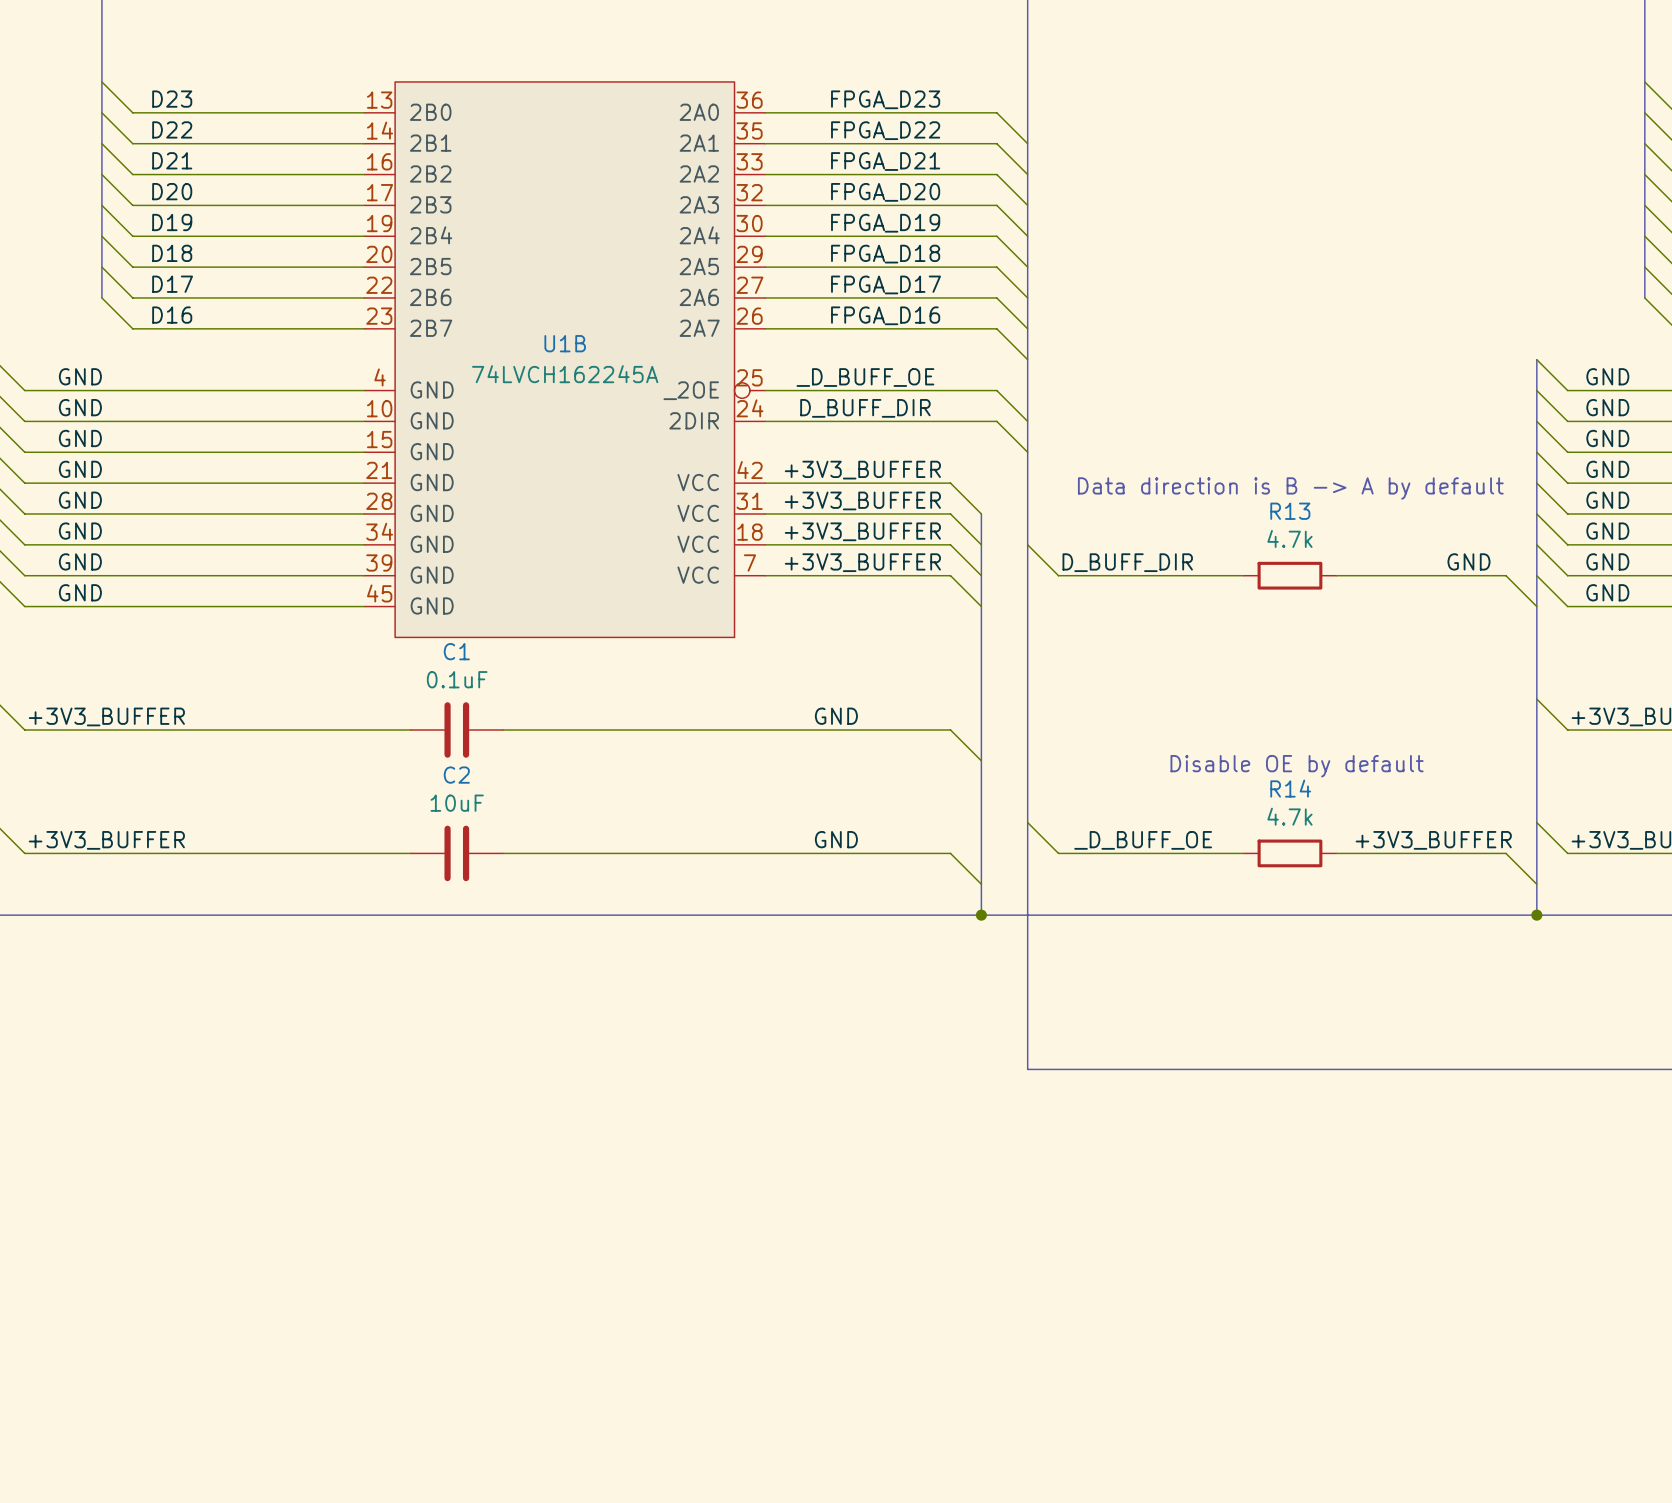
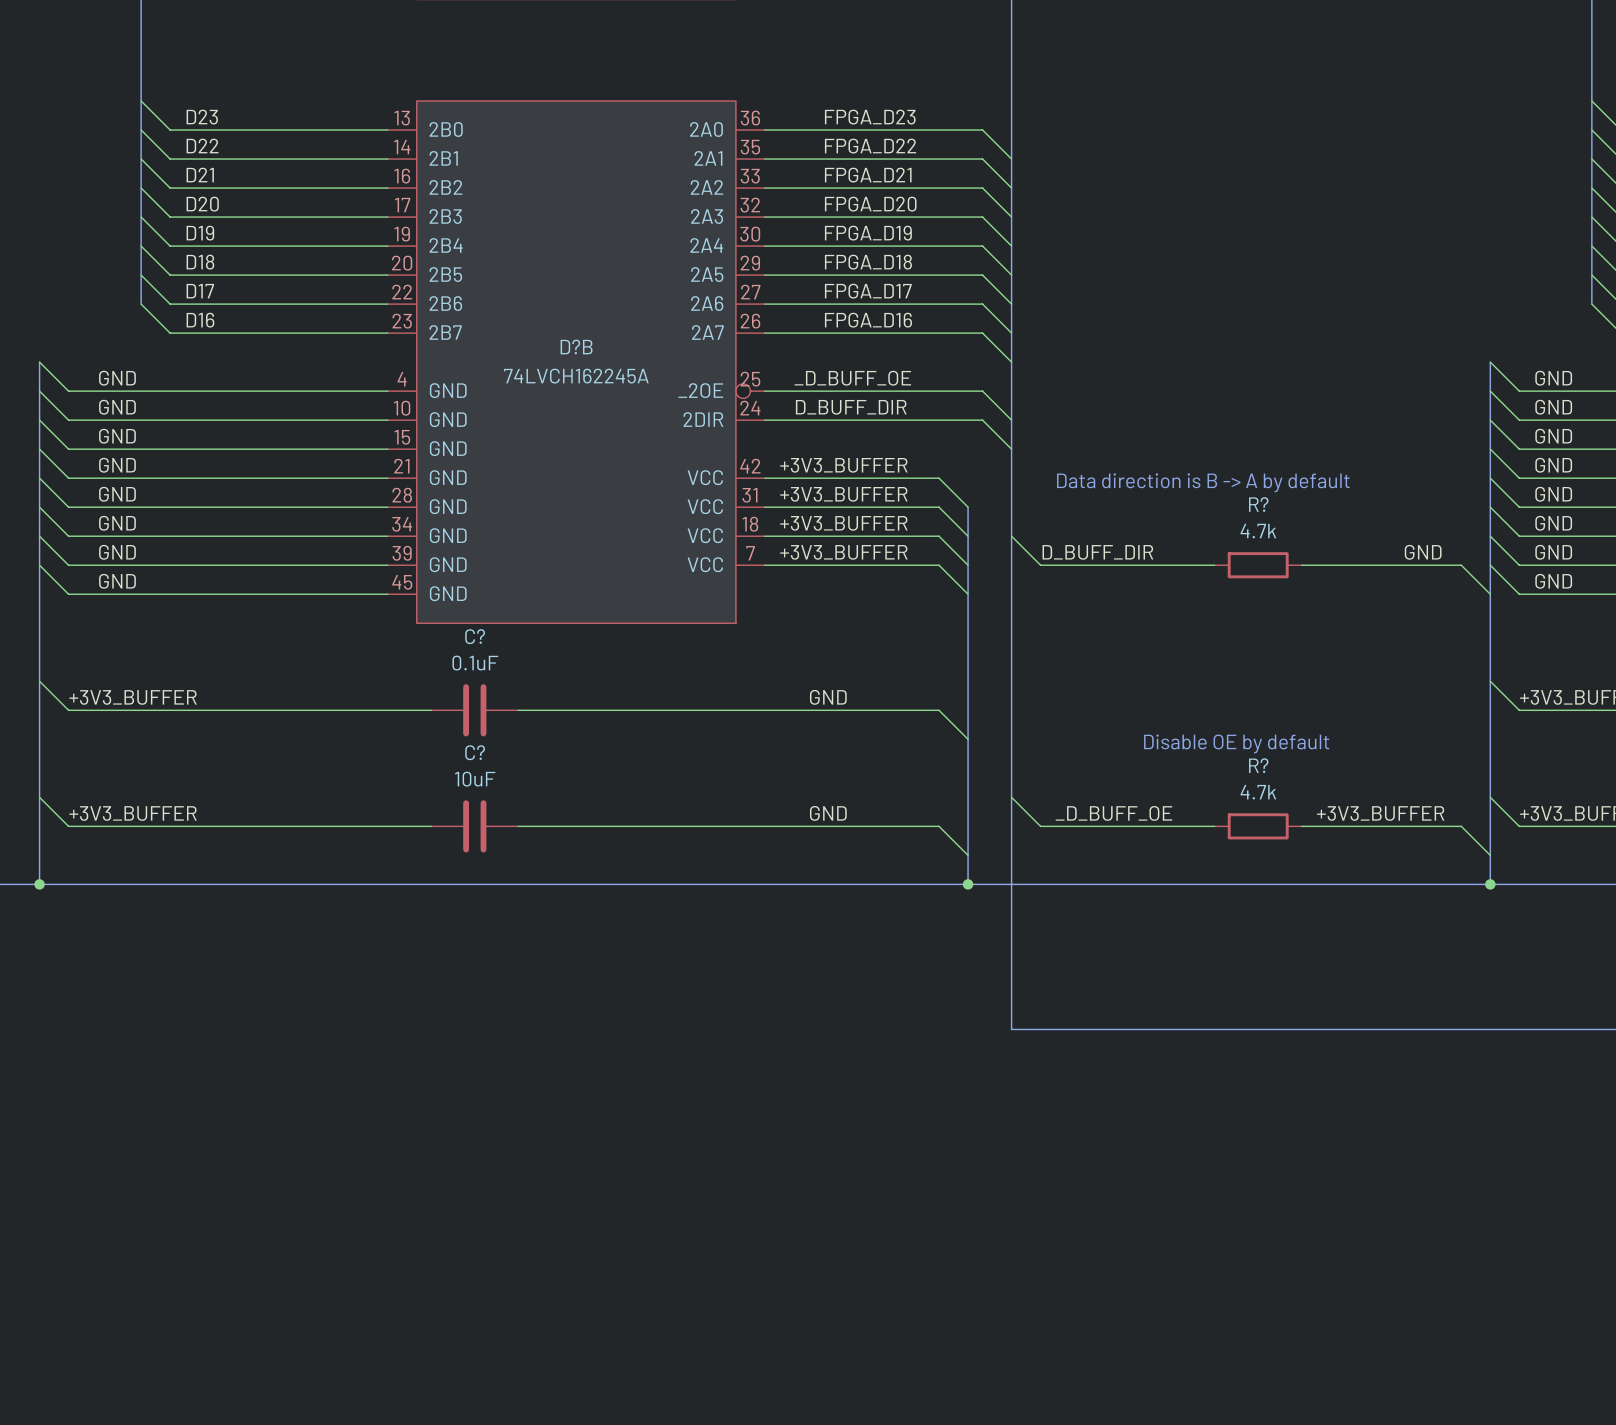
U1B name: U1B (565, 343) -> D?B (576, 346)
R13 name: R13 (1290, 511) -> R? (1258, 504)
C1 name: C1 (456, 651) -> C? (475, 636)
C2 name: C2 (456, 775) -> C? (475, 752)
R14 name: R14 (1290, 788) -> R? (1258, 765)

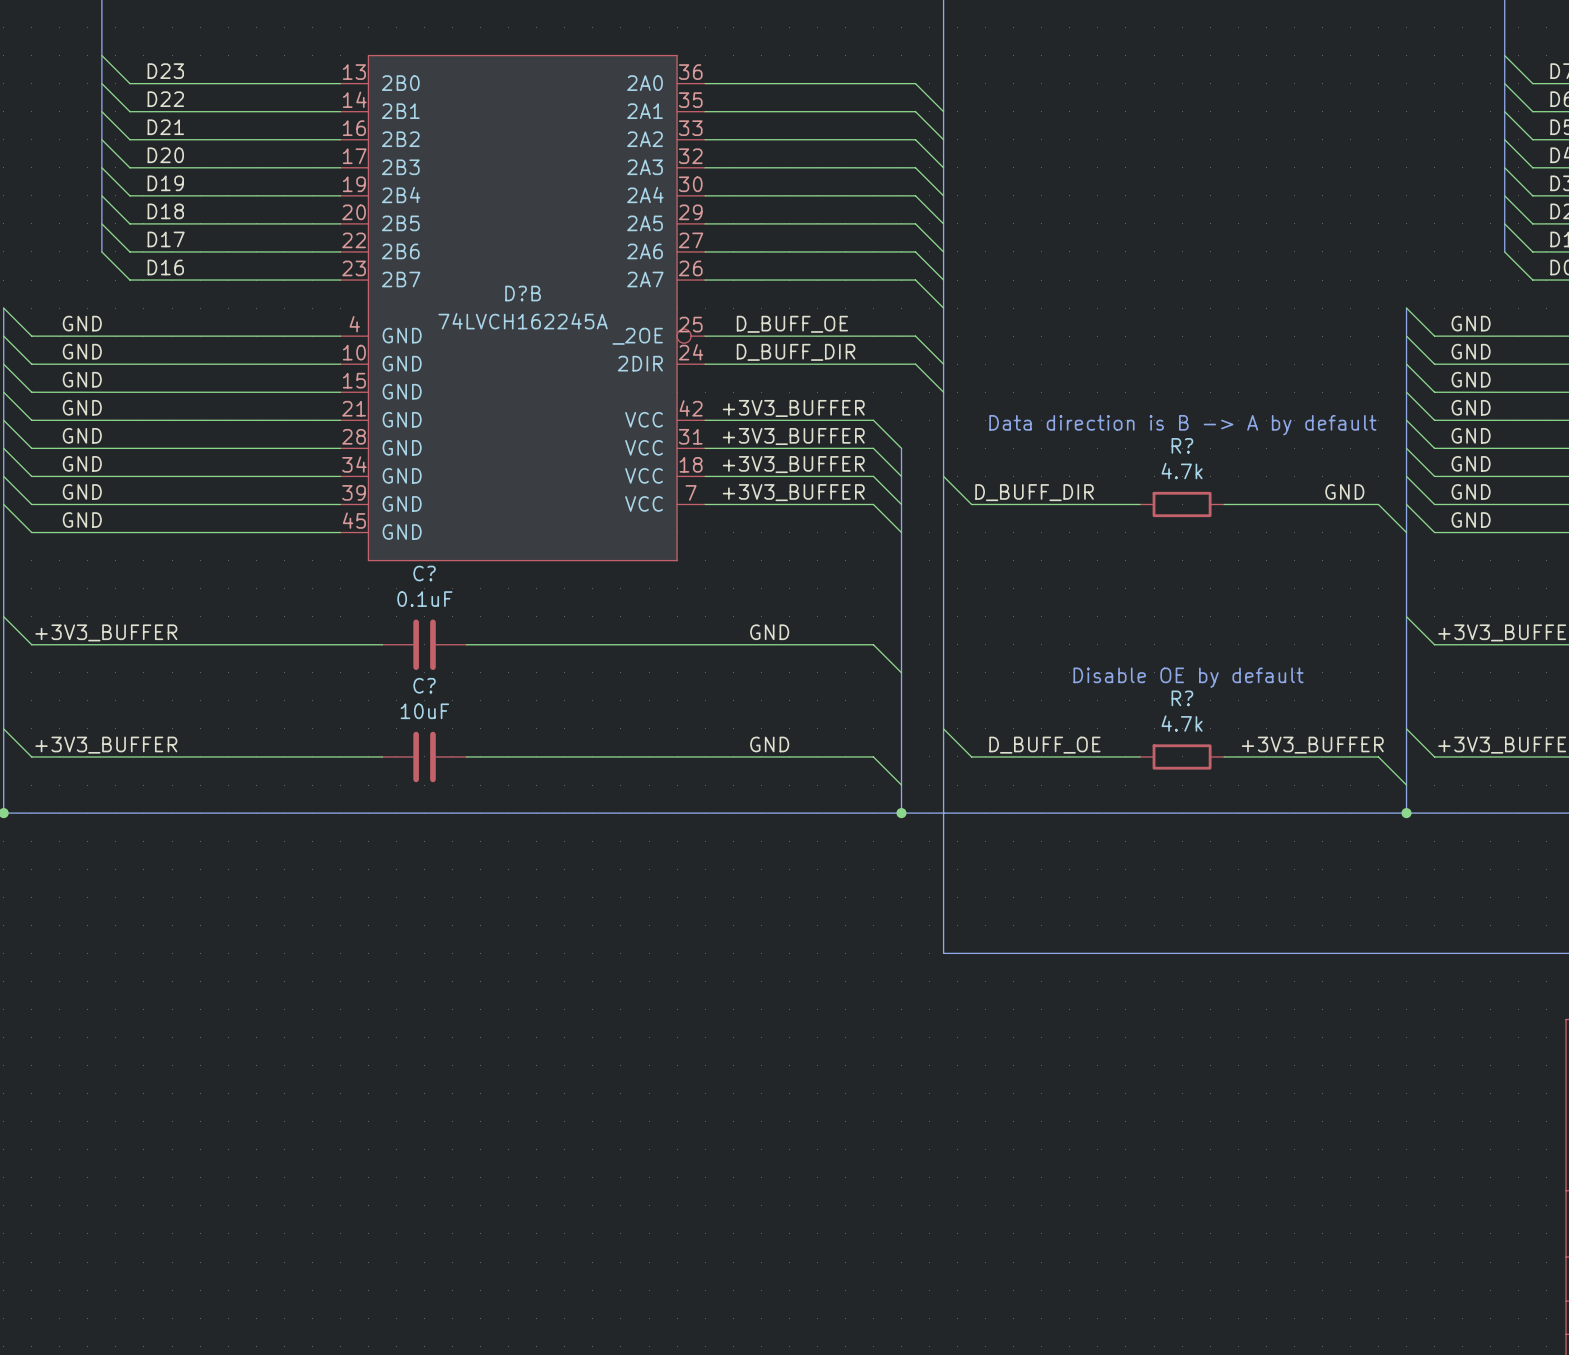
label: FPGA_D23 (870, 117) -> none
label: FPGA_D22 (870, 146) -> none
label: FPGA_D21 (868, 175) -> none
label: FPGA_D20 (870, 204) -> none
label: FPGA_D19 (868, 233) -> none
label: FPGA_D18 (868, 262) -> none
label: FPGA_D17 (868, 291) -> none
label: FPGA_D16 (868, 320) -> none
label: _D_BUFF_OE (852, 378) -> D_BUFF_OE (792, 324)
label: _D_BUFF_OE (1113, 813) -> D_BUFF_OE (1044, 745)

